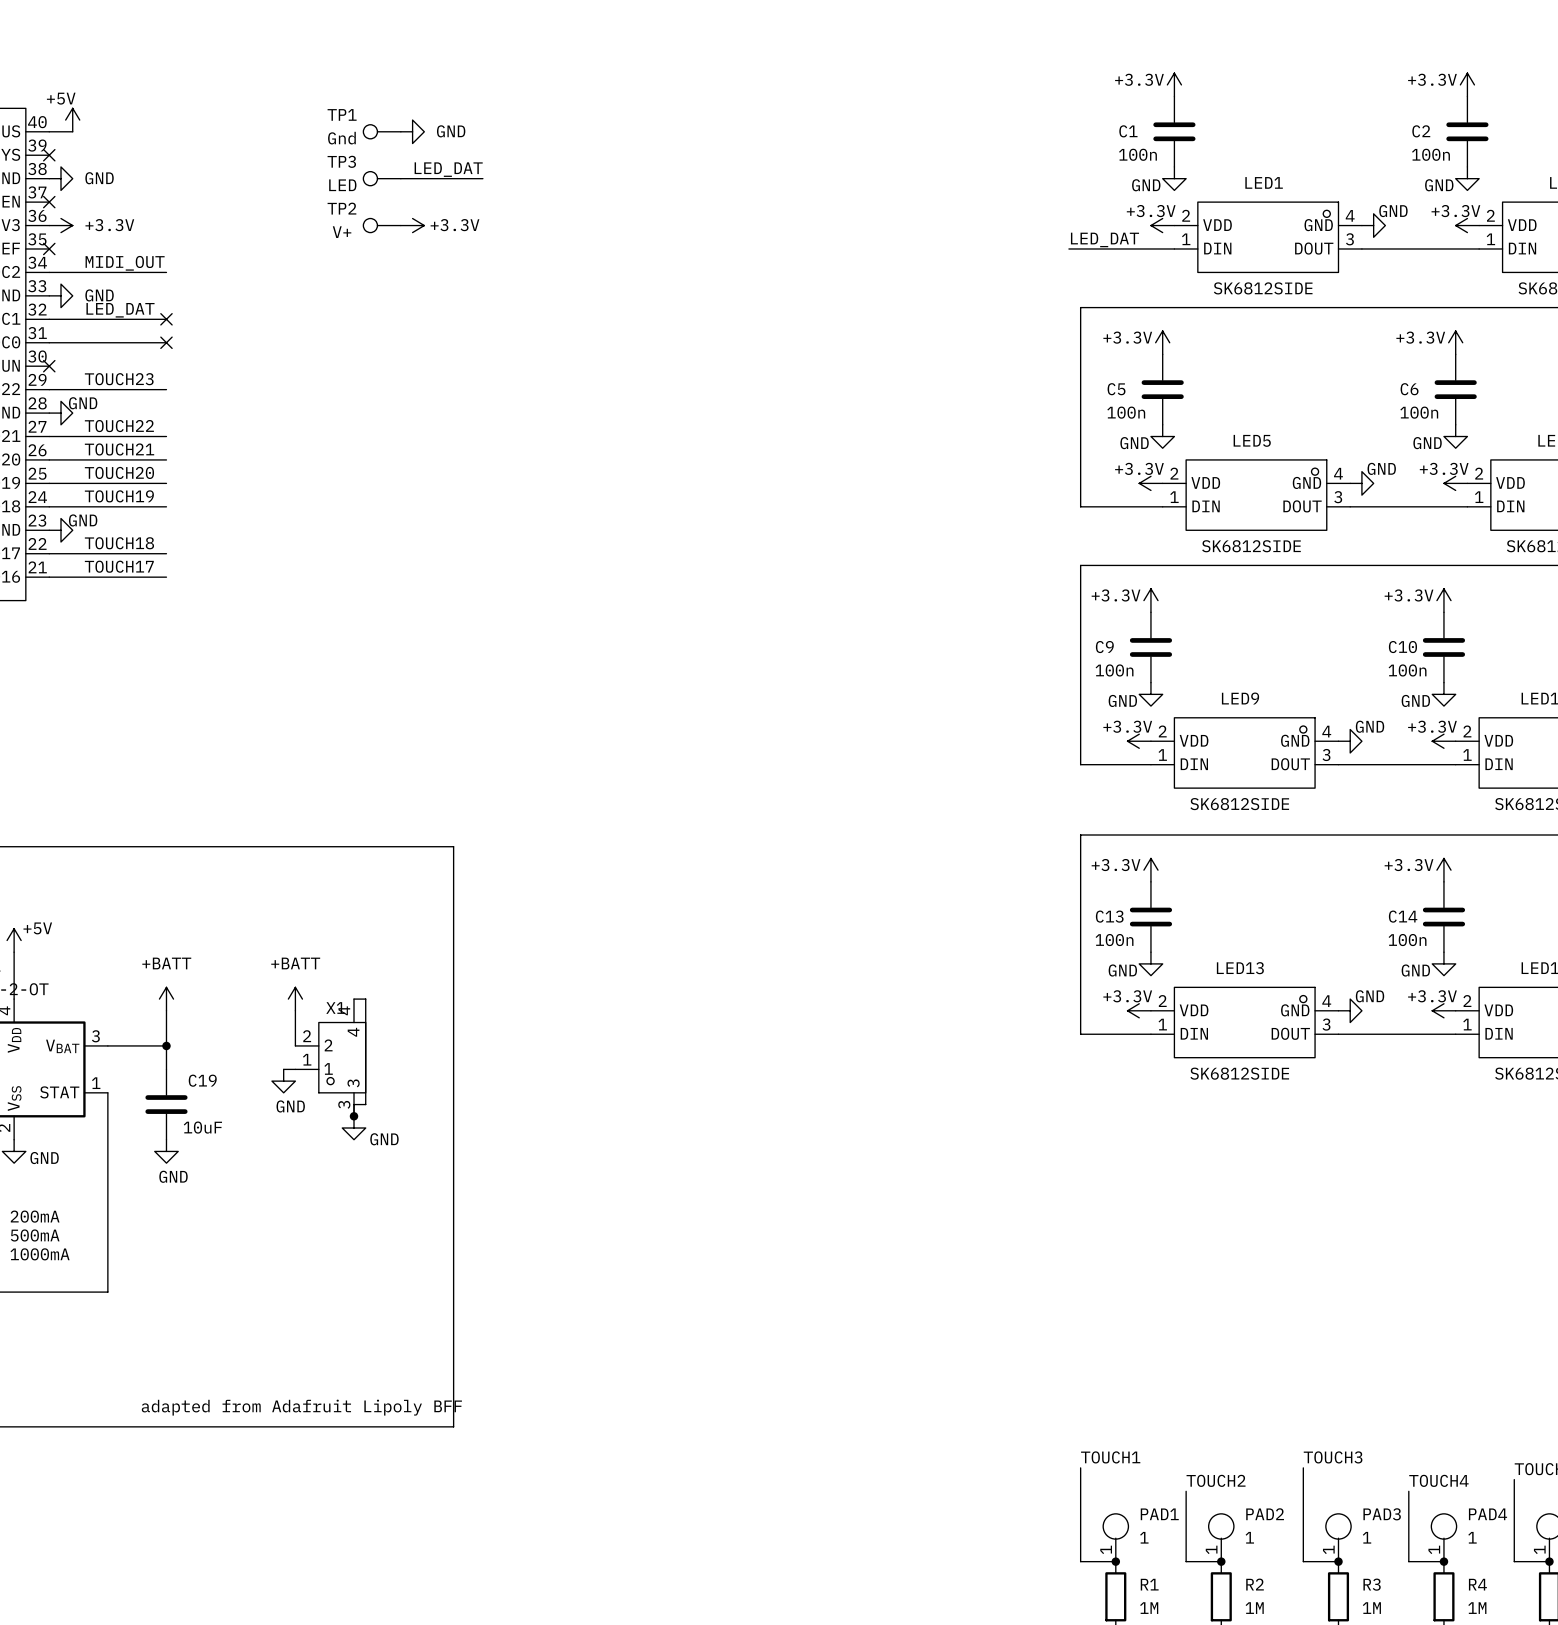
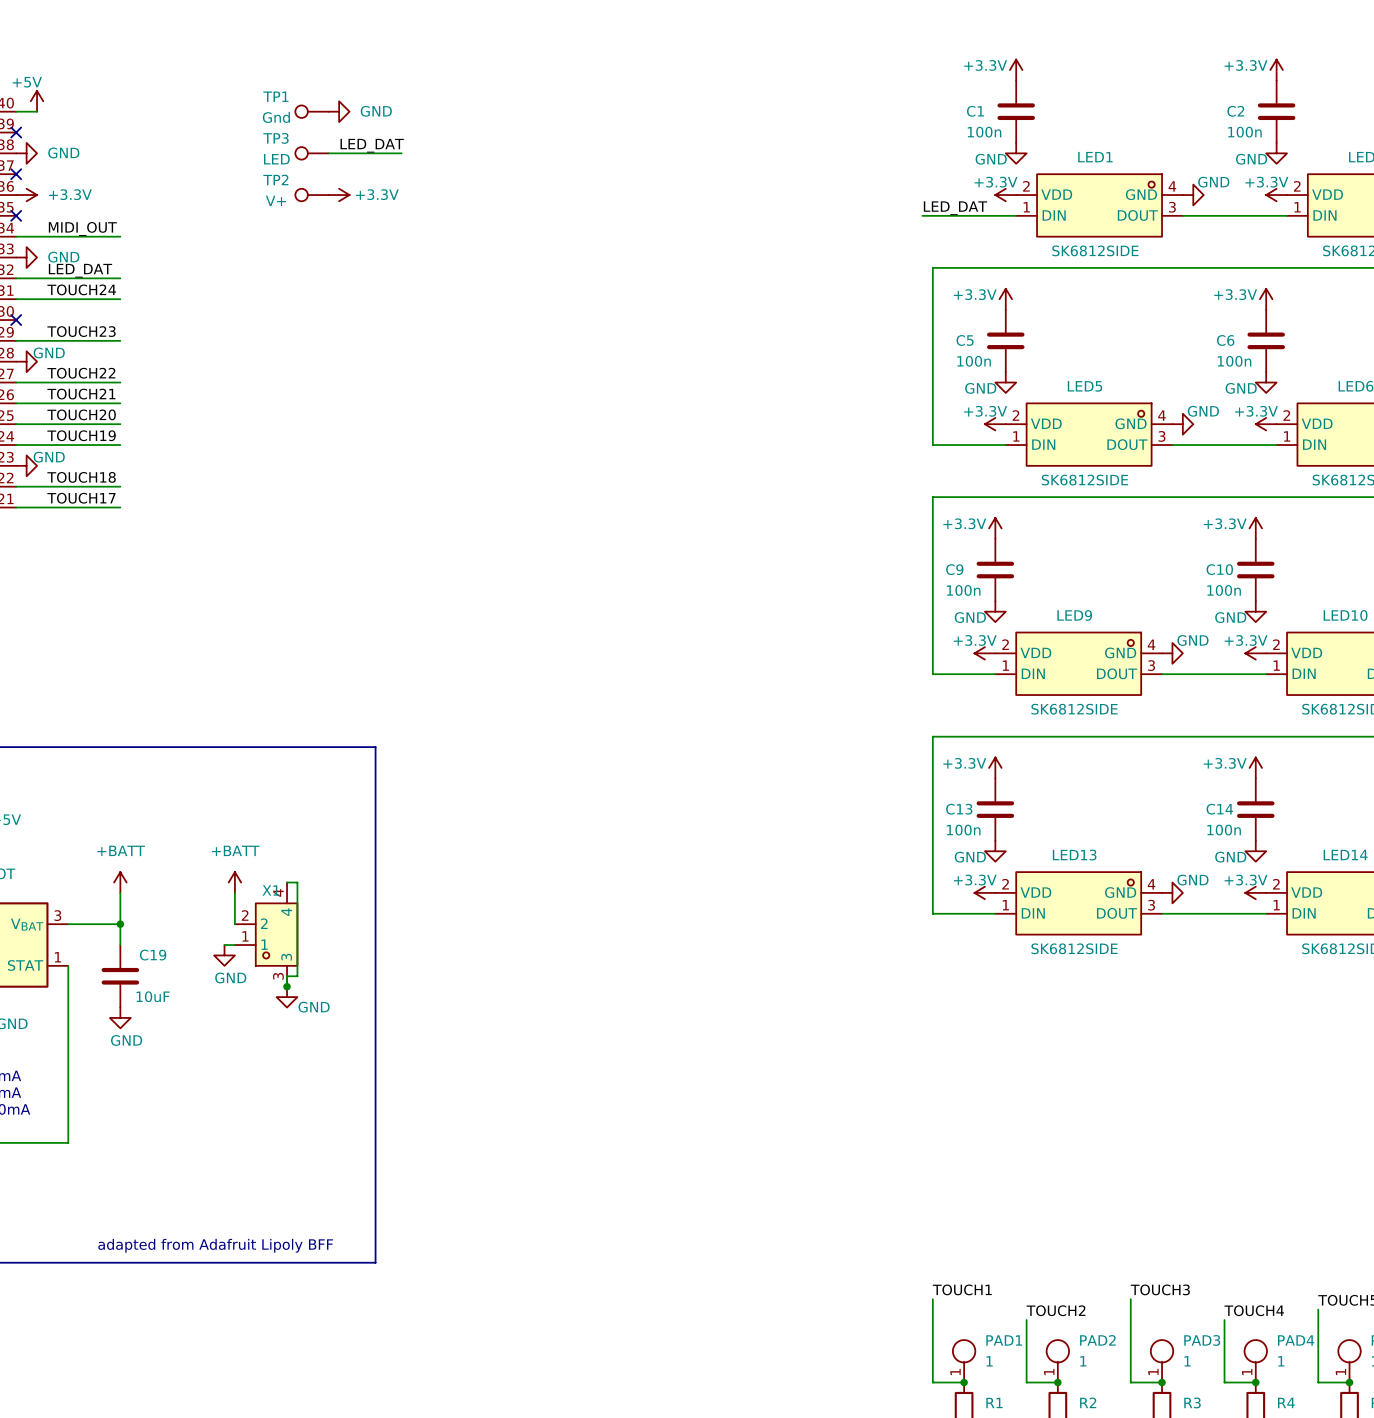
no-connect mark: (166, 319) -> none
label: none -> TOUCH24 (81, 289)
no-connect mark: (166, 342) -> none

